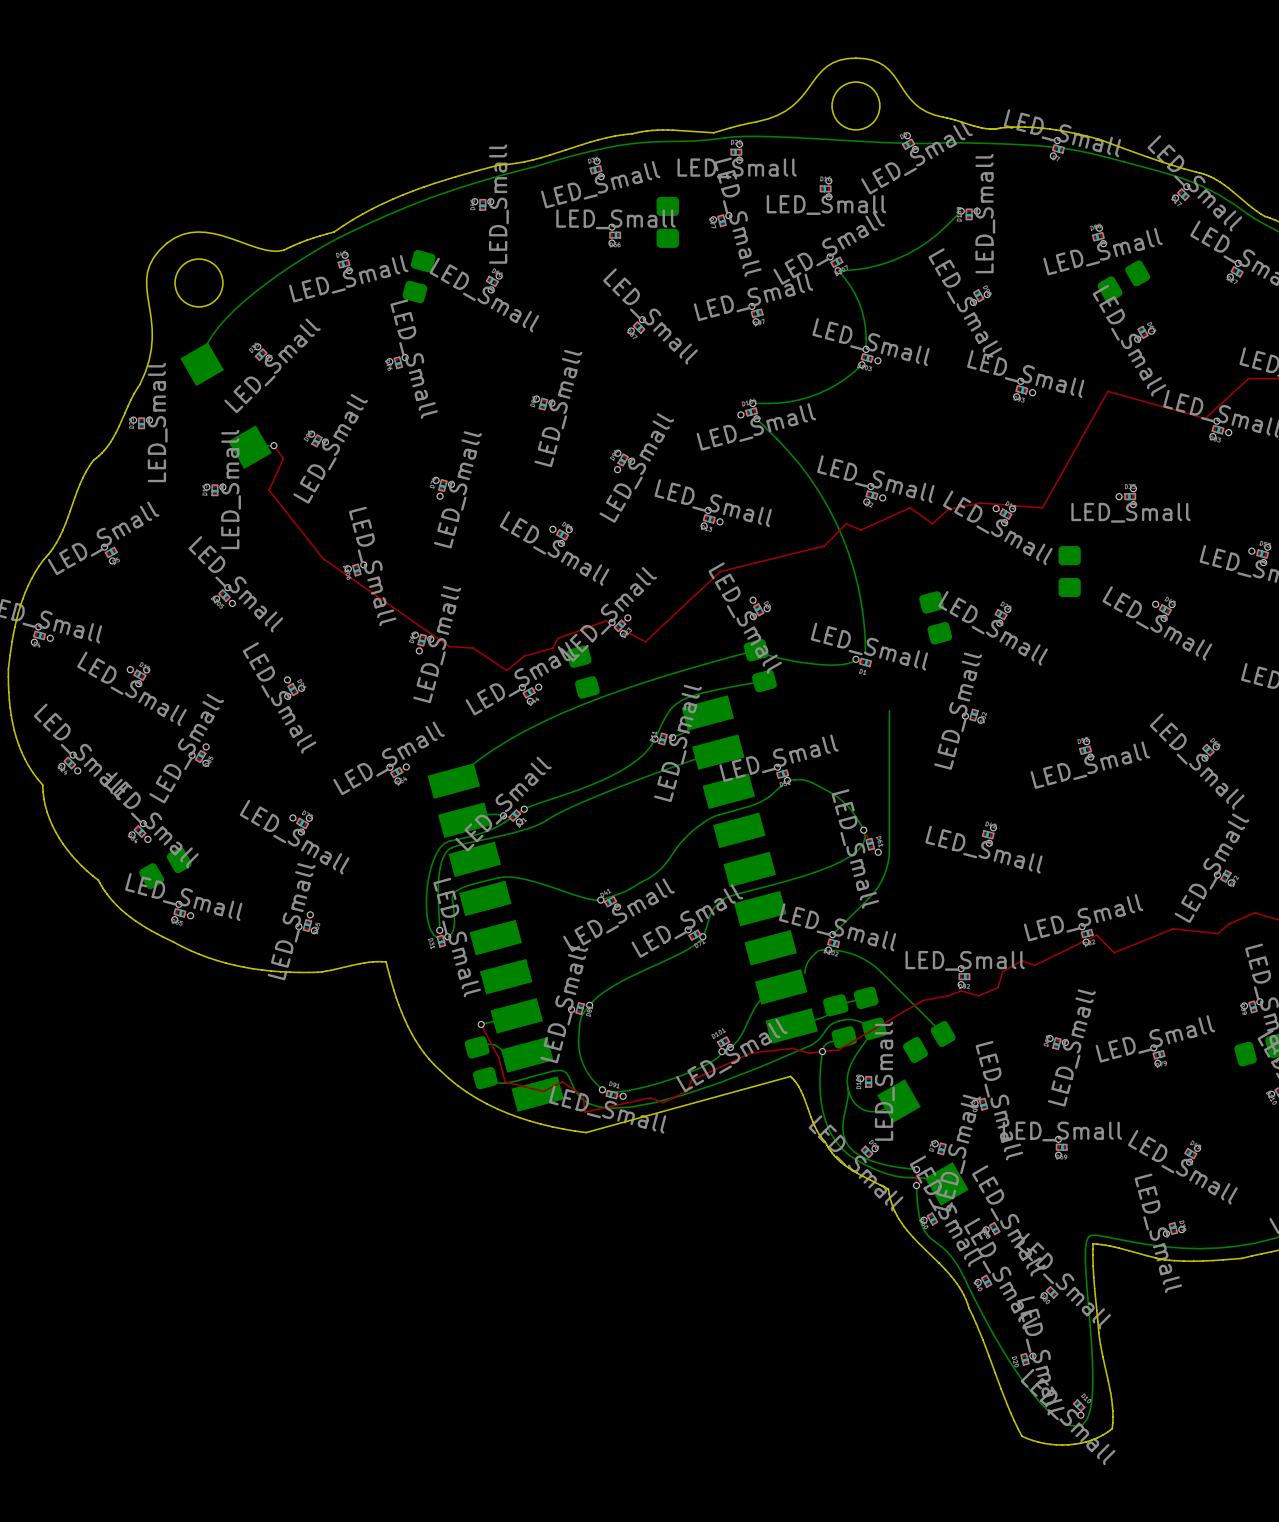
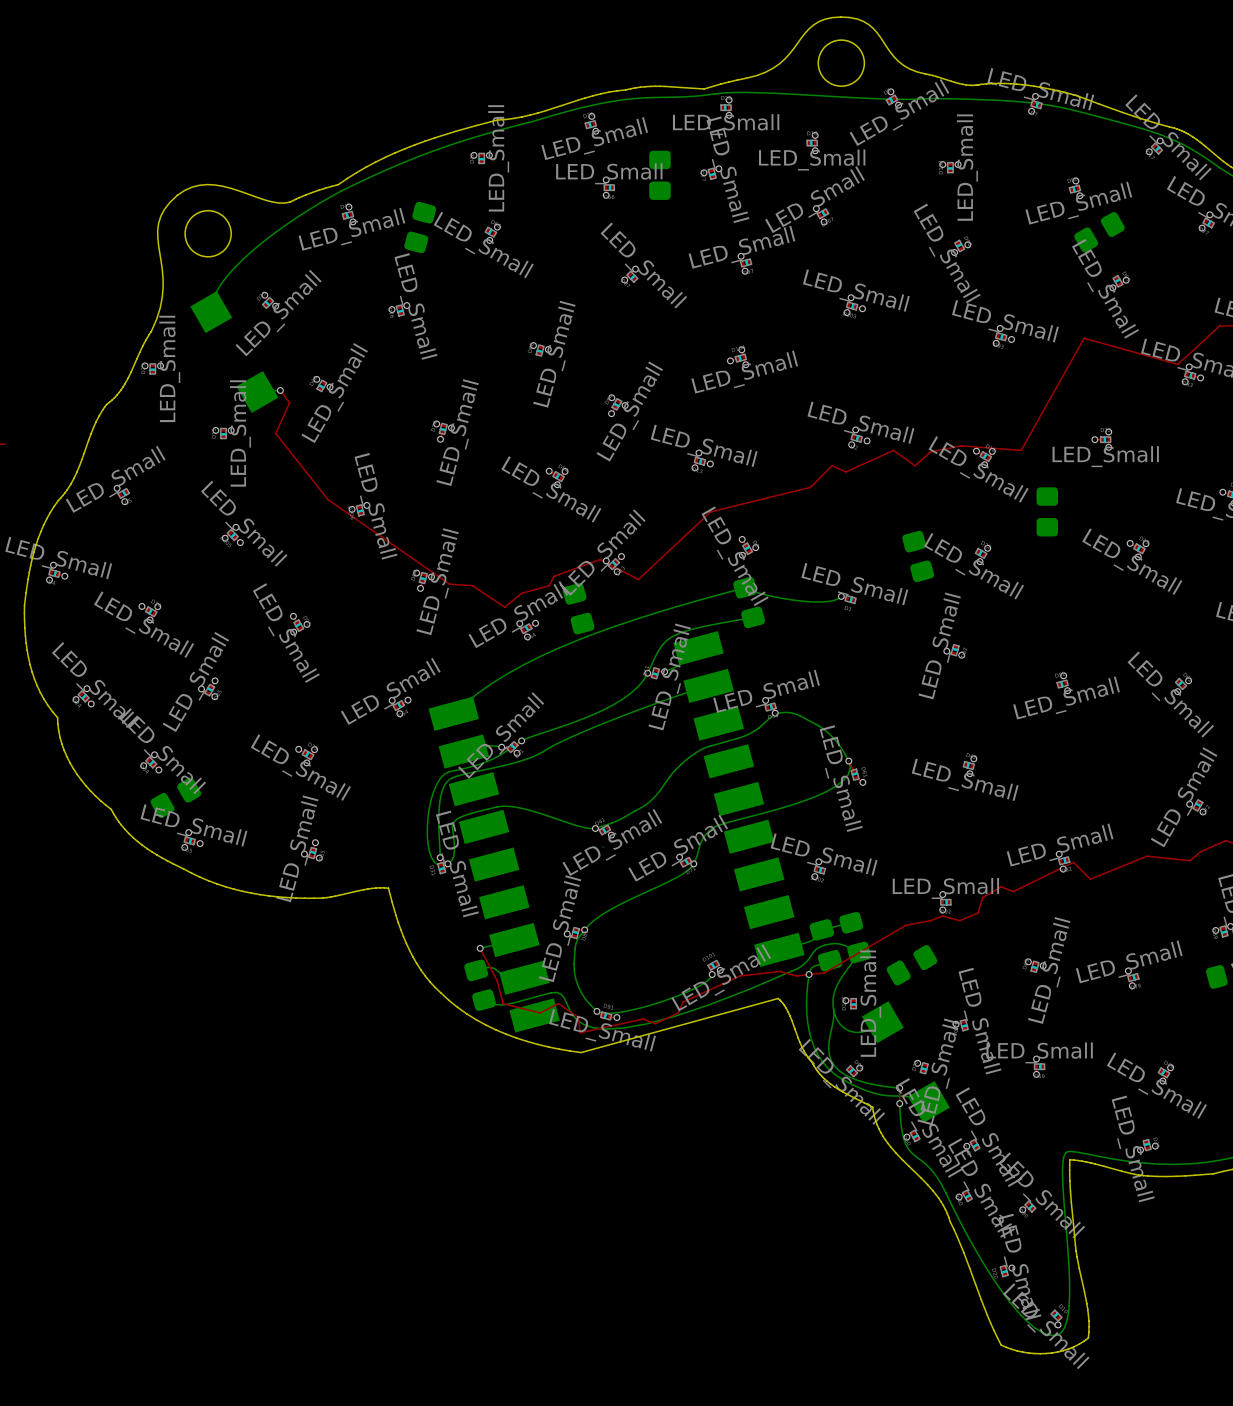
bottom track: (961, 211) (937, 233) (907, 254) (873, 266) (838, 270) (854, 293) (861, 310) (865, 329) (866, 349) -> none
bottom track: (861, 364) (837, 384) (809, 397) (778, 403) (752, 403) -> none
bottom track: (756, 418) (799, 464) (819, 491) (835, 521) (848, 552) (857, 585) (863, 619) (865, 652) -> none
bottom track: (889, 710) (889, 849) (886, 869) (873, 893) (832, 934) -> none
bottom track: (804, 973) (808, 961) (819, 950) (835, 950) (856, 955) (880, 971) (943, 1034) -> none
bottom track: (779, 987) (768, 992) (761, 999) (739, 1037) (730, 1047) -> none

